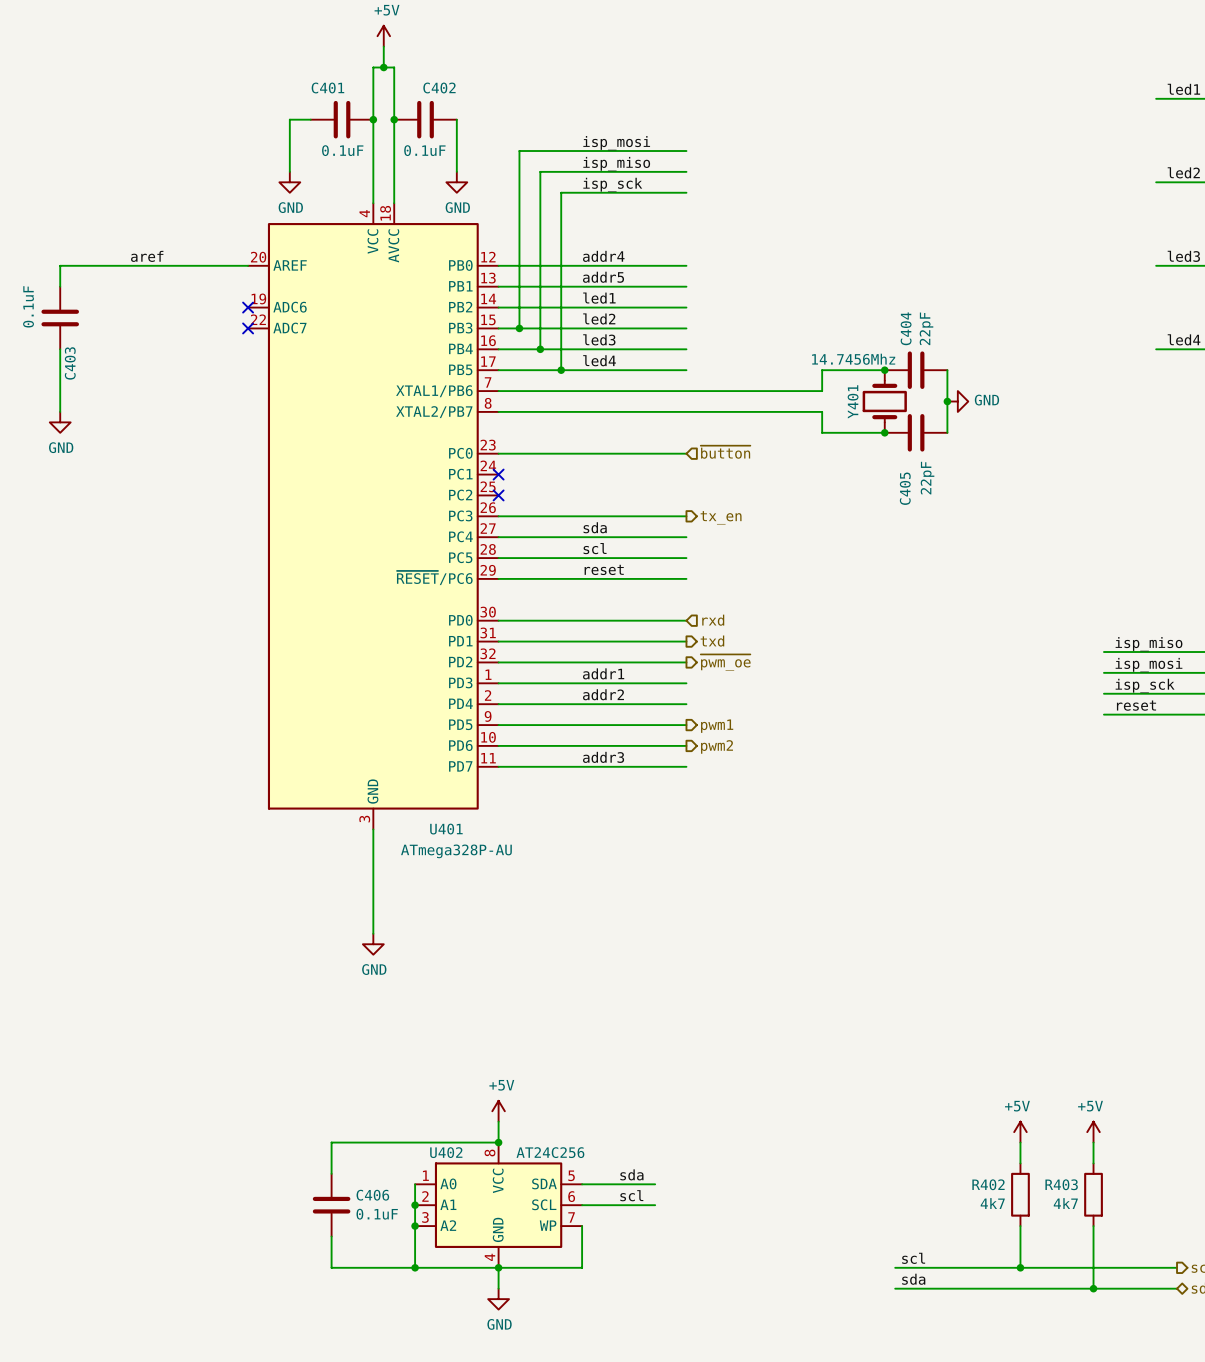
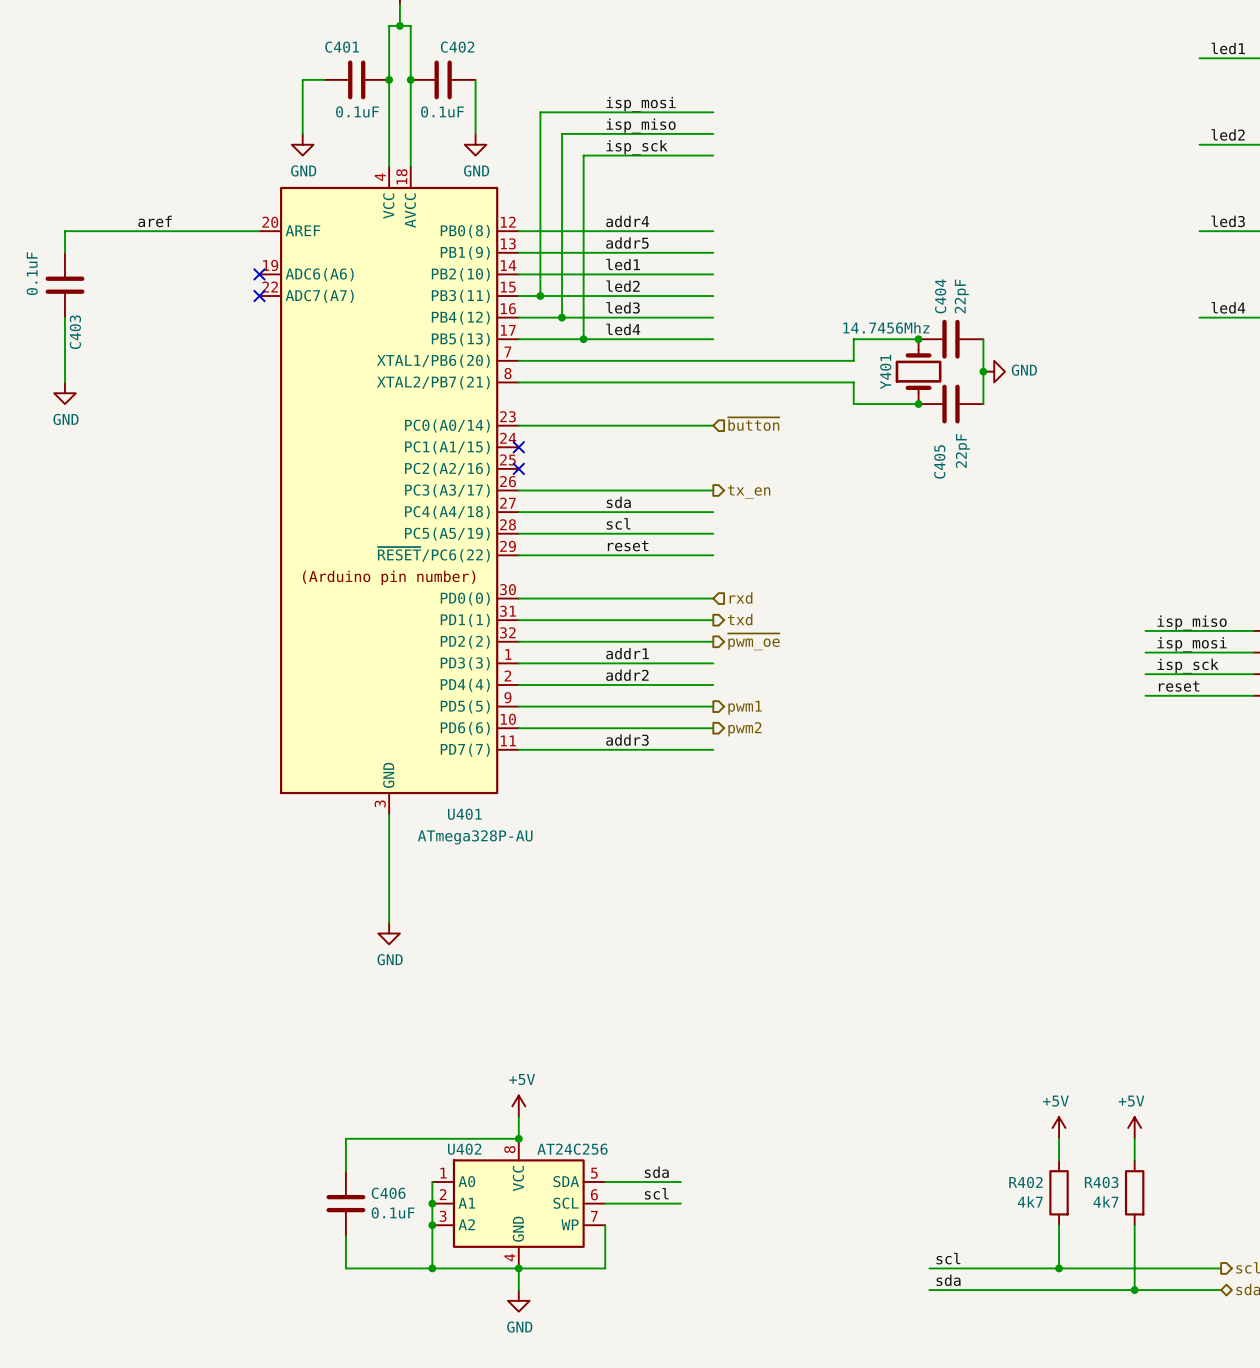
U401 symbol: [248, 203, 499, 830] -> [259, 166, 519, 815]

